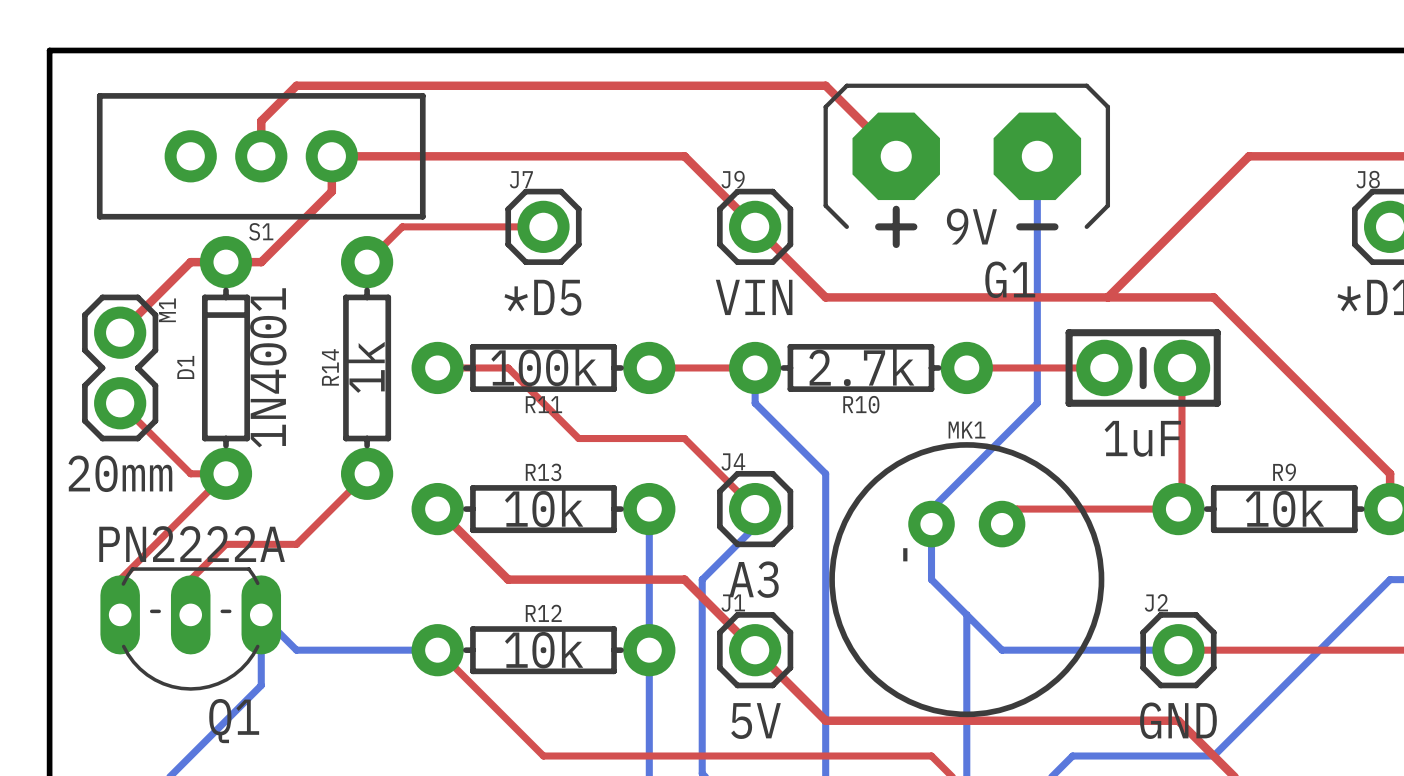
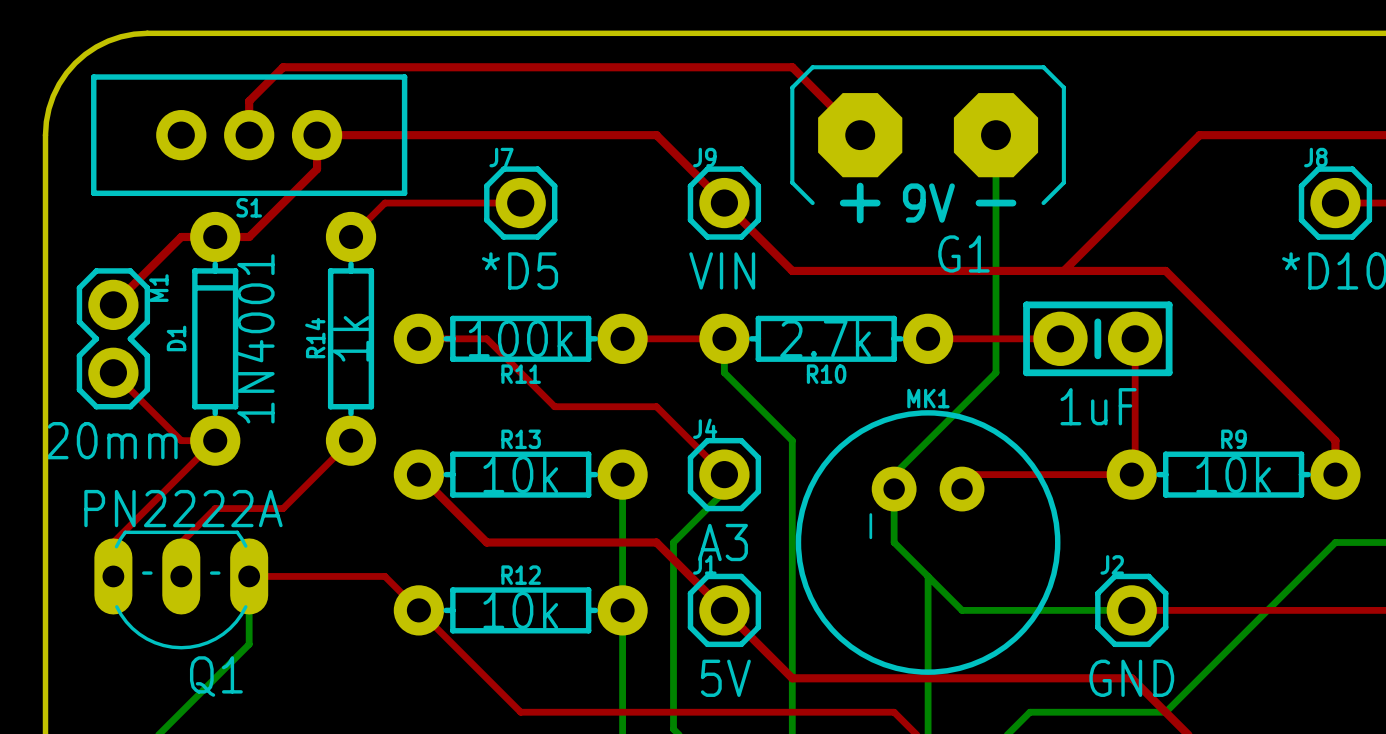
board edge: (155, 50) (49, 50) (49, 156) -> (147, 33) (120, 36) (108, 41) (96, 46) (75, 63) (59, 84) (53, 96) (48, 108) (45, 135)
top track: none -> (249, 576) (384, 576) (418, 610)
bottom track: (261, 614) (296, 650) (437, 650) -> none

